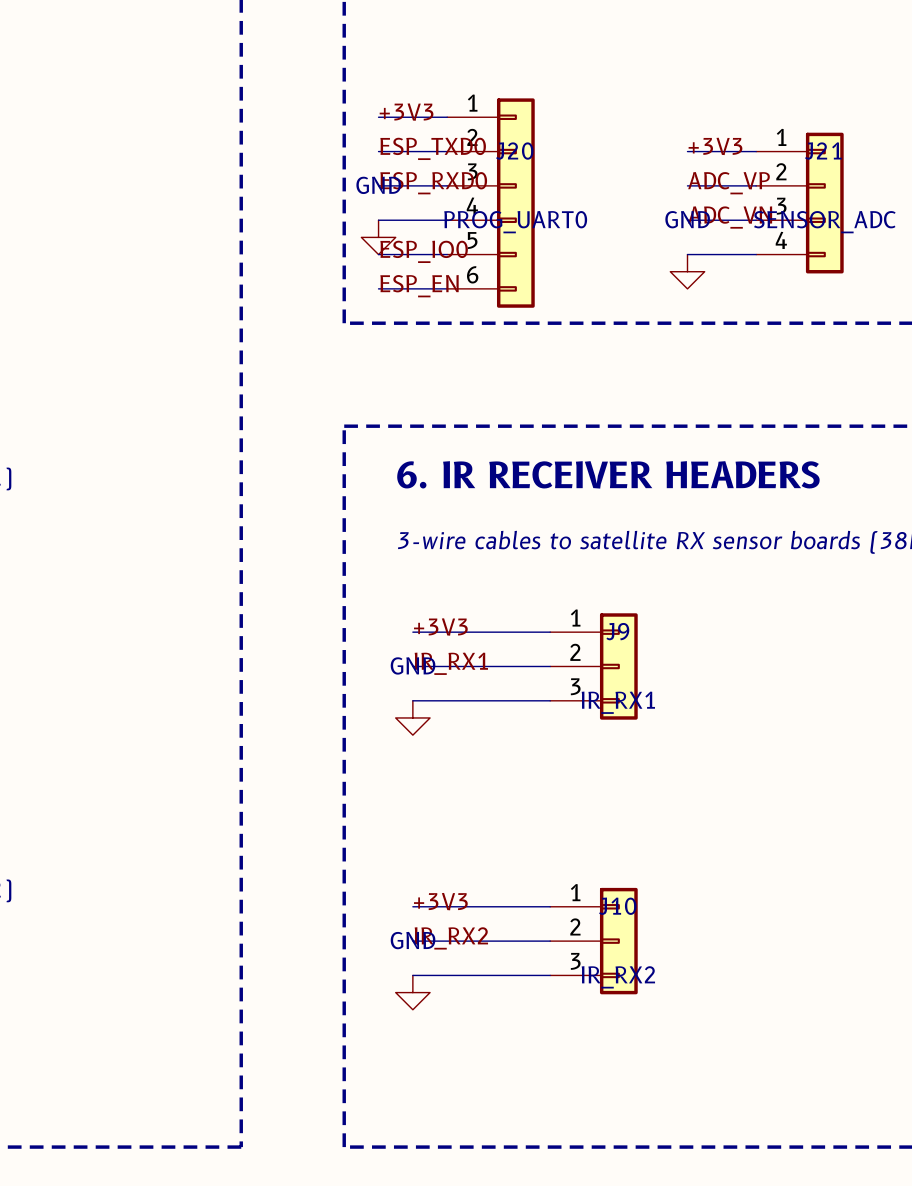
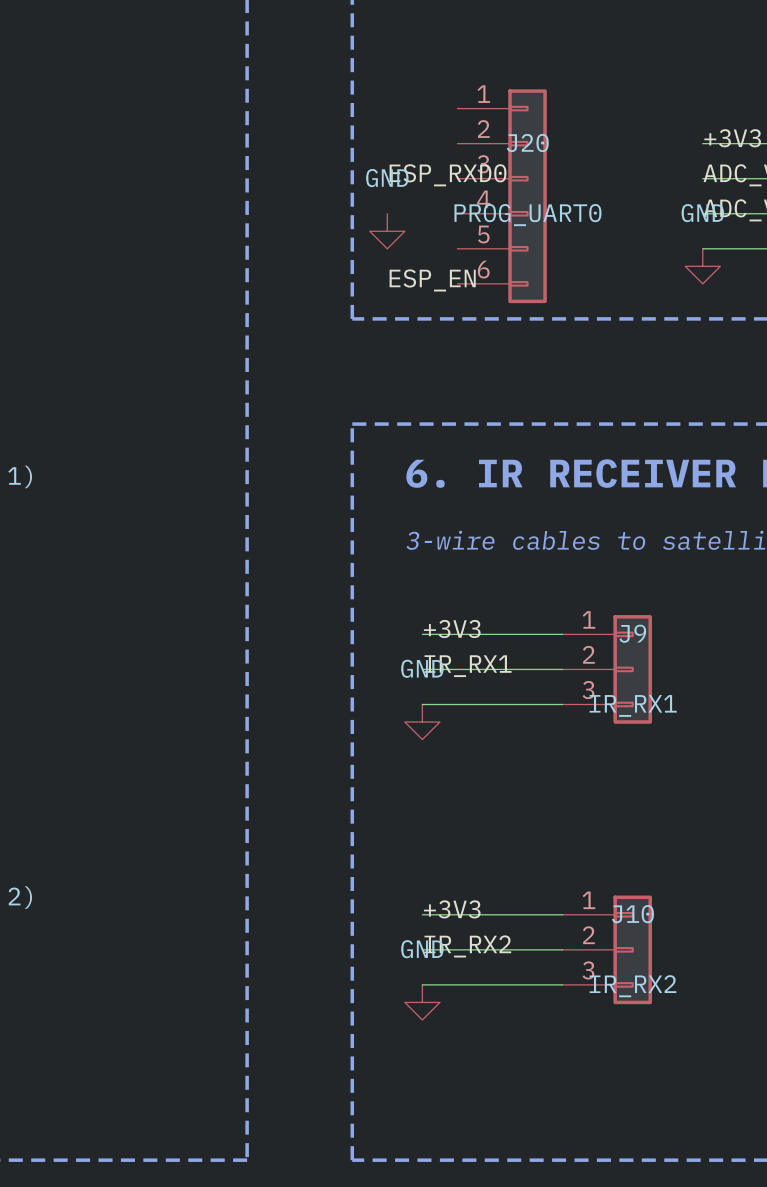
label: +3V3 (406, 112) -> none
wire: (378, 117) (447, 117) -> none
label: ESP_TXD0 (433, 148) -> none
wire: (378, 151) (447, 151) -> none
wire: (378, 185) (447, 185) -> none
wire: (378, 220) (447, 220) -> none
label: ESP_IO0 (424, 251) -> none
wire: (378, 254) (447, 254) -> none
wire: (378, 288) (447, 288) -> none

